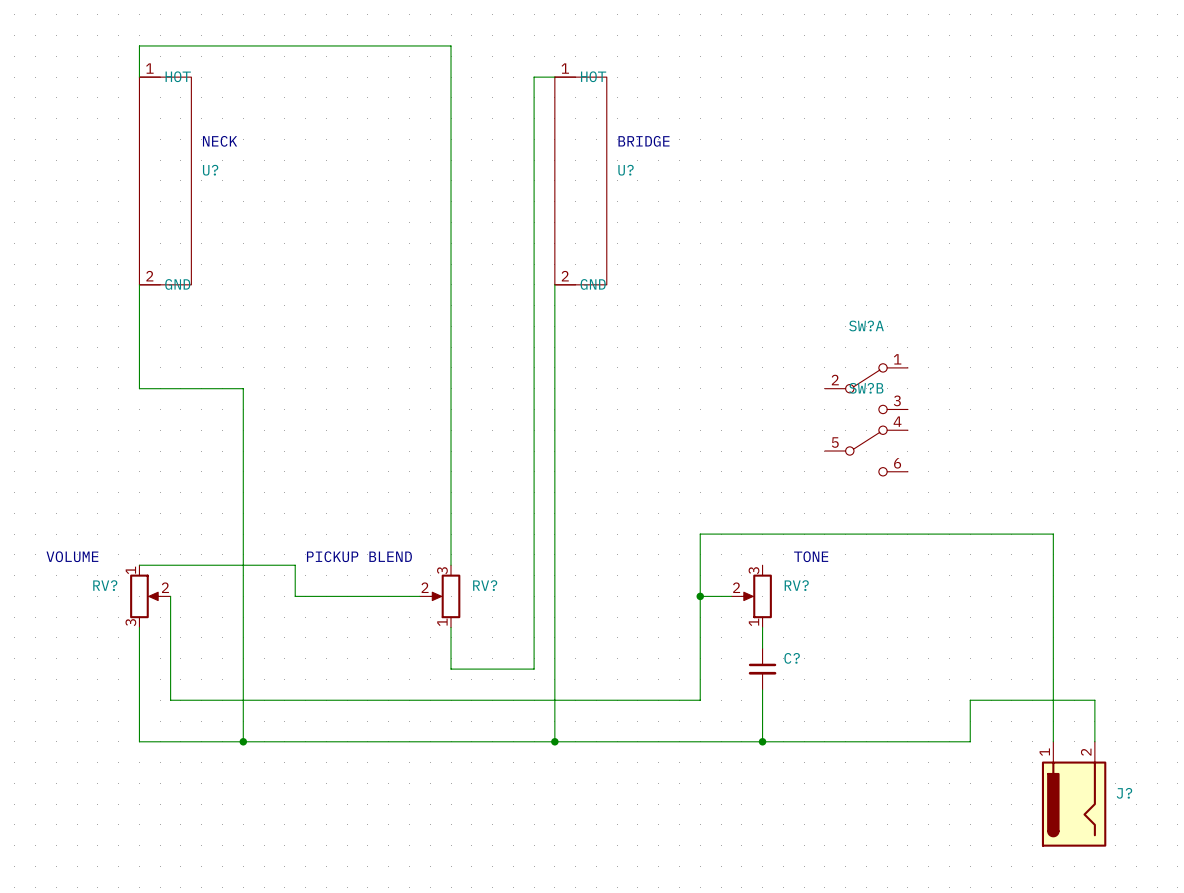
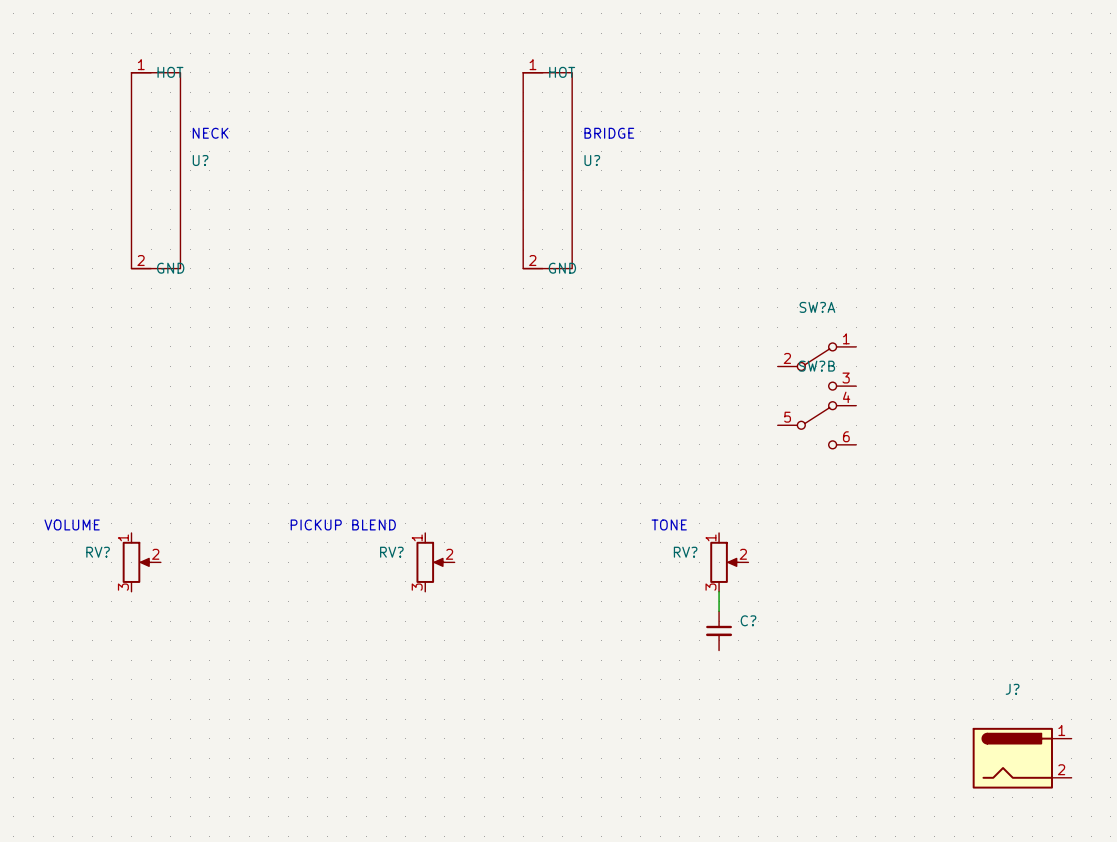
wire: (139, 77) (139, 45) (451, 45) (451, 565) -> none
wire: (554, 77) (534, 77) (534, 669) (451, 669) (451, 627) -> none
wire: (139, 284) (139, 388) (243, 388) (243, 741) -> none
wire: (554, 284) (554, 741) -> none
text position: TONE (811, 556) -> TONE (669, 524)
wire: (139, 565) (295, 565) (295, 596) (419, 596) -> none
RV? name position: RV? (485, 585) -> RV? (391, 552)
RV? name position: RV? (796, 585) -> RV? (685, 552)
wire: (170, 596) (170, 700) (700, 700) (700, 534) (1053, 534) (1053, 741) -> none
RV? rotation: 0° (445, 596) -> 180° (430, 562)
wire: (700, 596) (731, 596) -> none
junction: (700, 596) -> none
RV? rotation: 0° (756, 596) -> 180° (724, 562)
wire: (139, 627) (139, 741) (970, 741) (970, 700) (1094, 700) (1094, 741) -> none
wire: (762, 689) (762, 741) -> none
junction: (243, 741) -> none
junction: (554, 741) -> none
junction: (762, 741) -> none
J? name position: J? (1124, 793) -> J? (1012, 689)
J? rotation: 0° (1074, 804) -> 90° clockwise (1012, 758)

